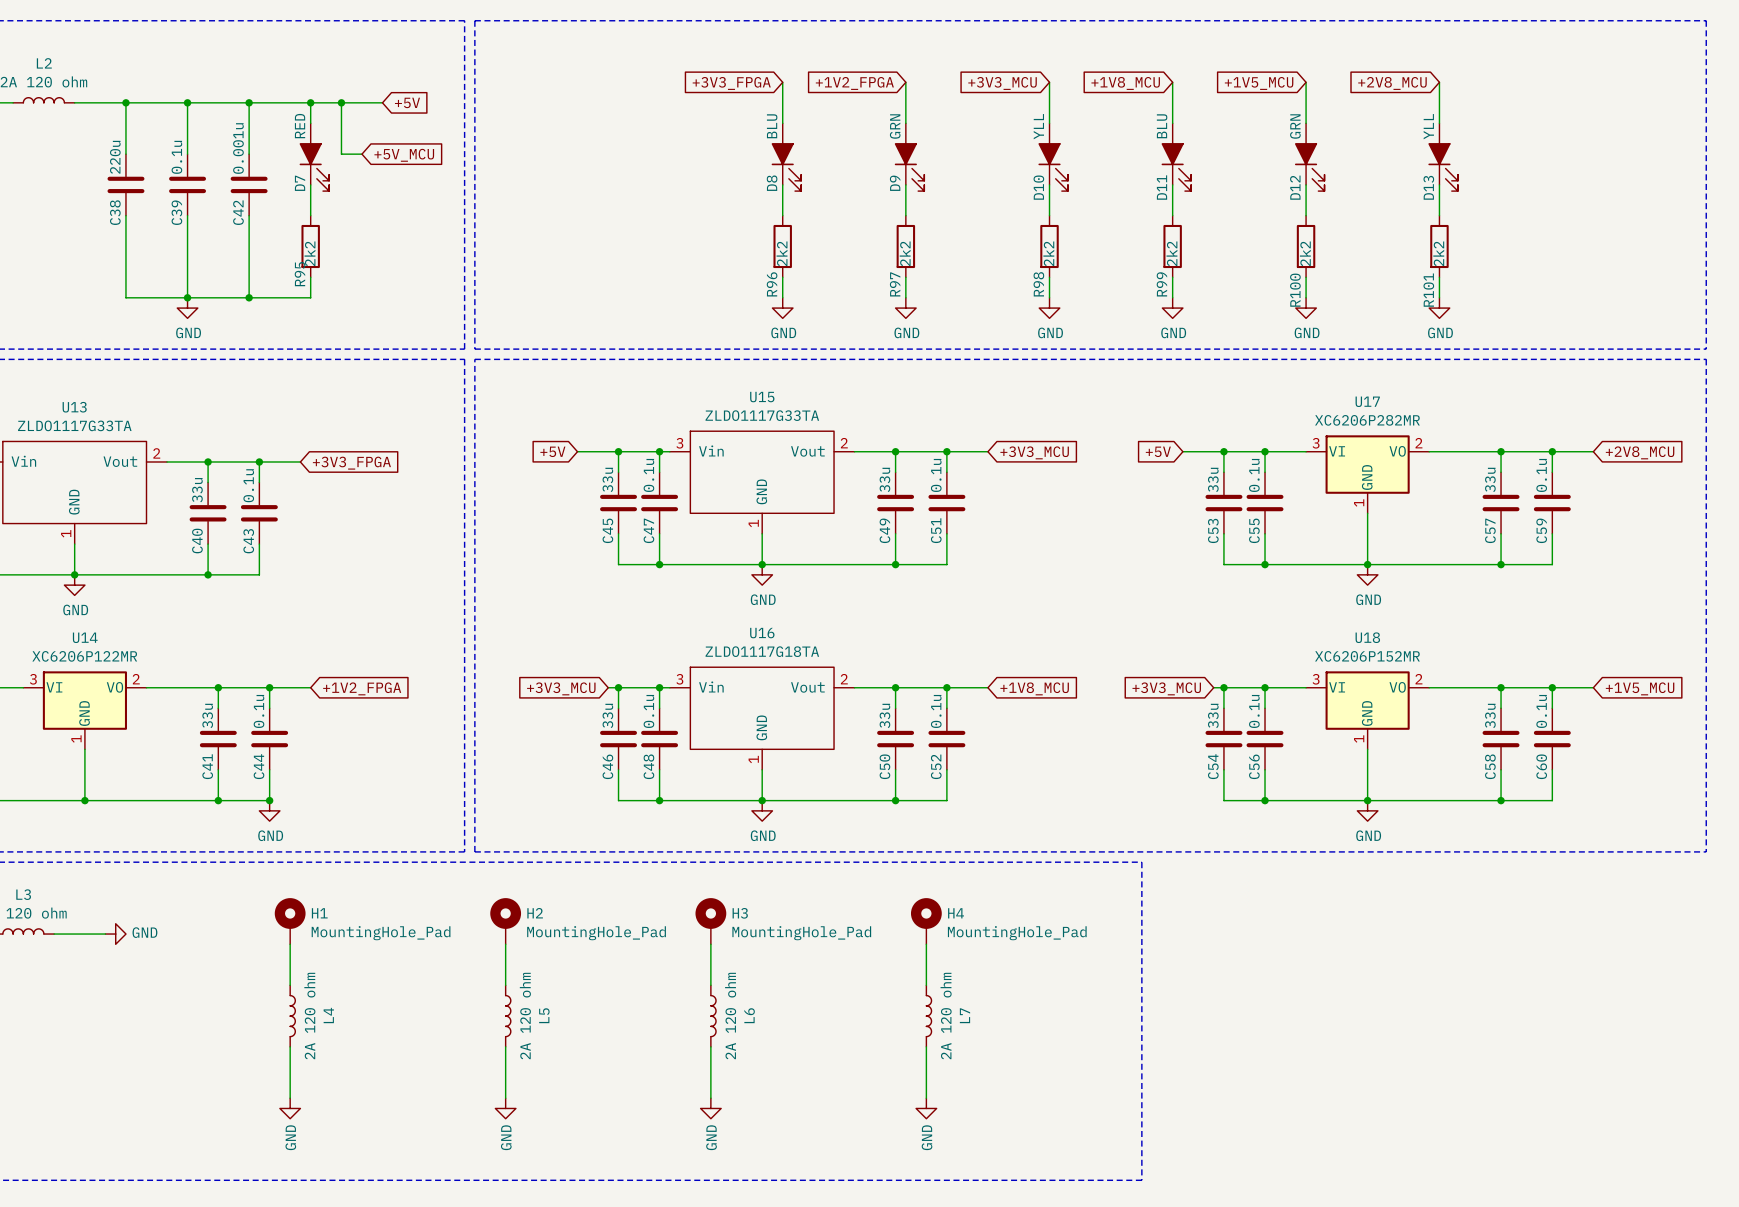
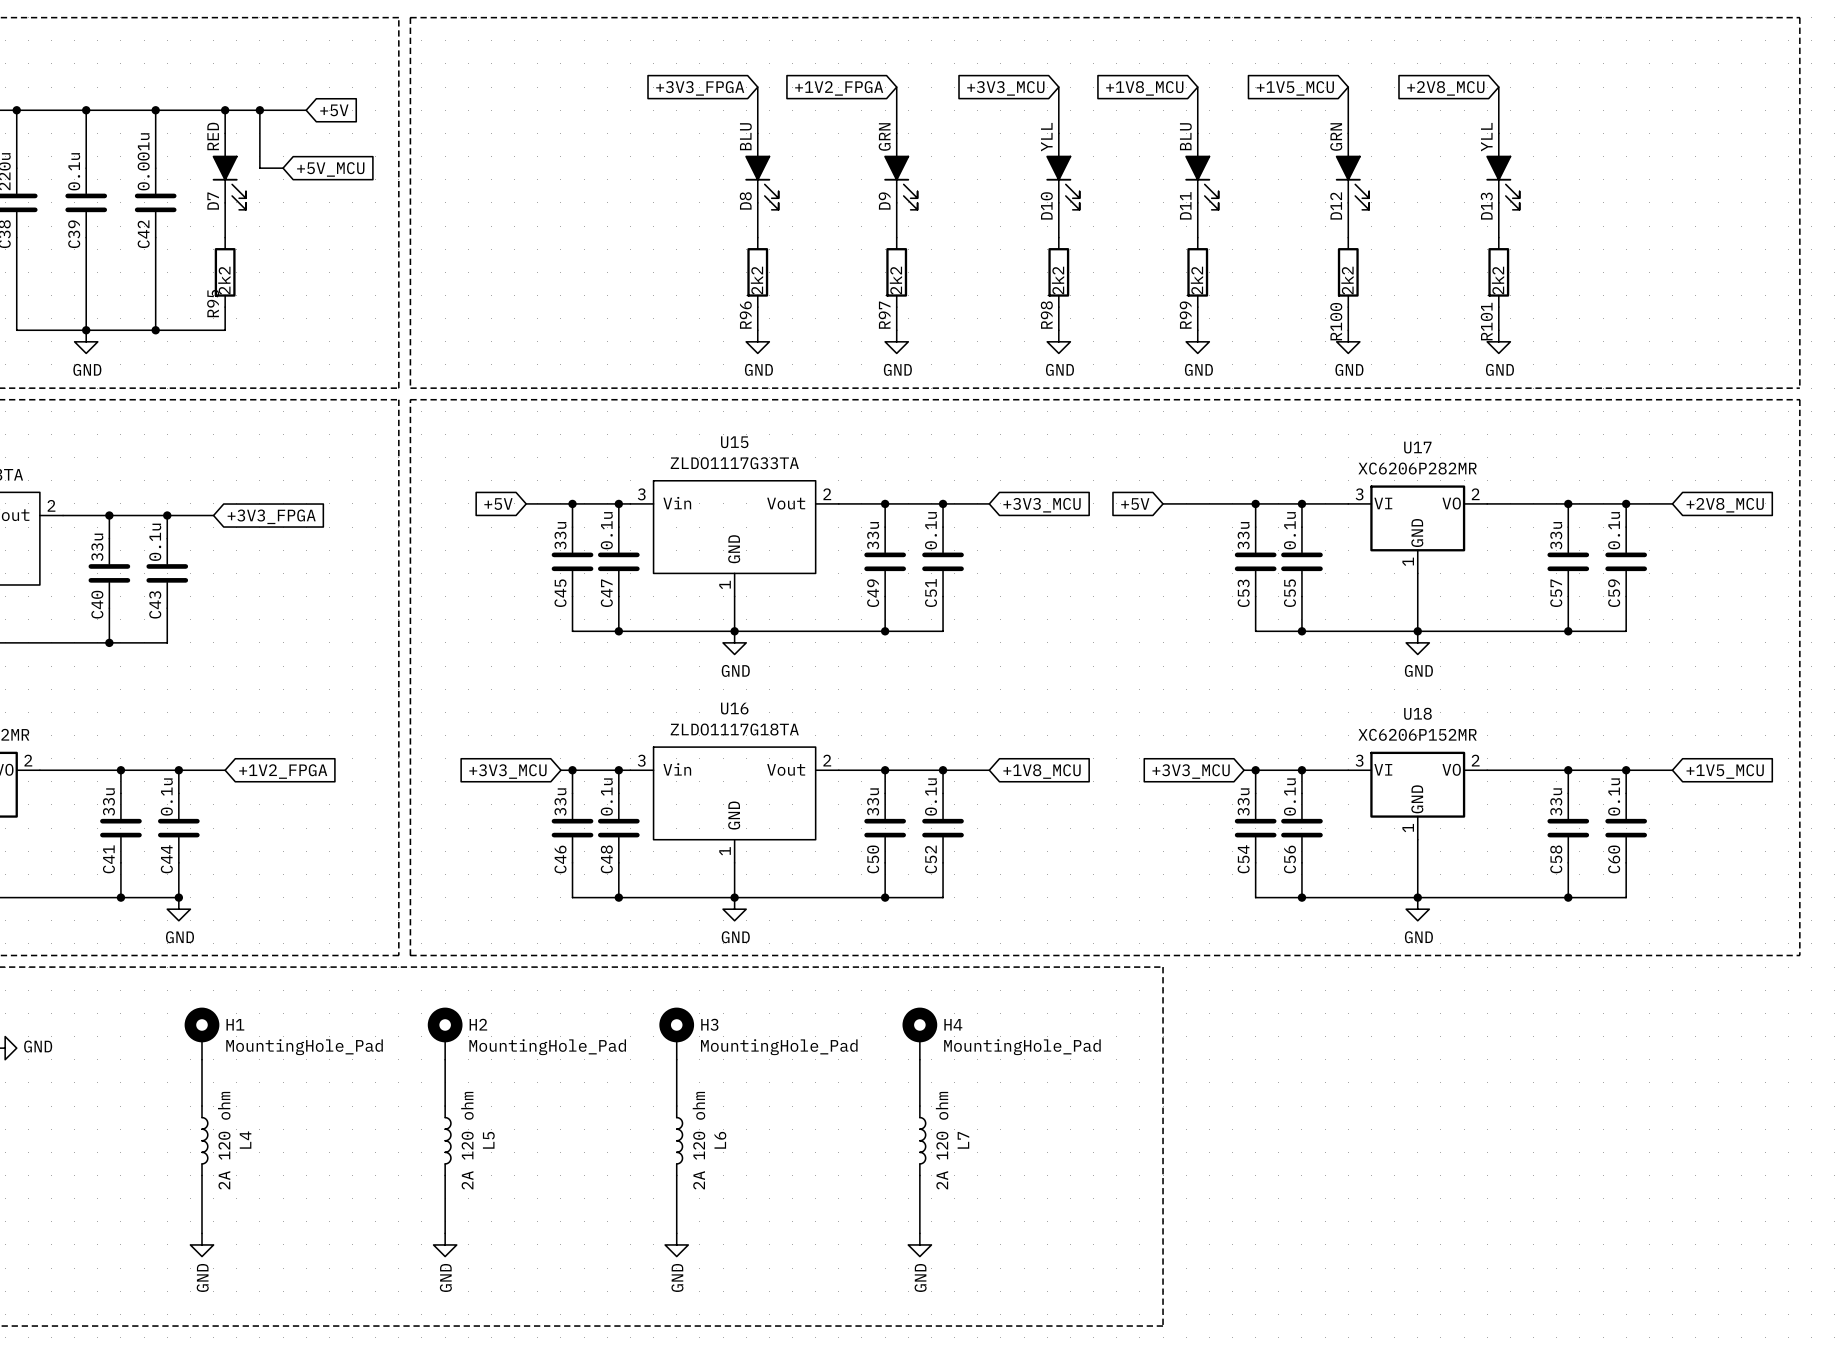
wire: none -> (1163, 503) (1209, 503)
global label position: +5V (1158, 451) -> +5V (1135, 504)

